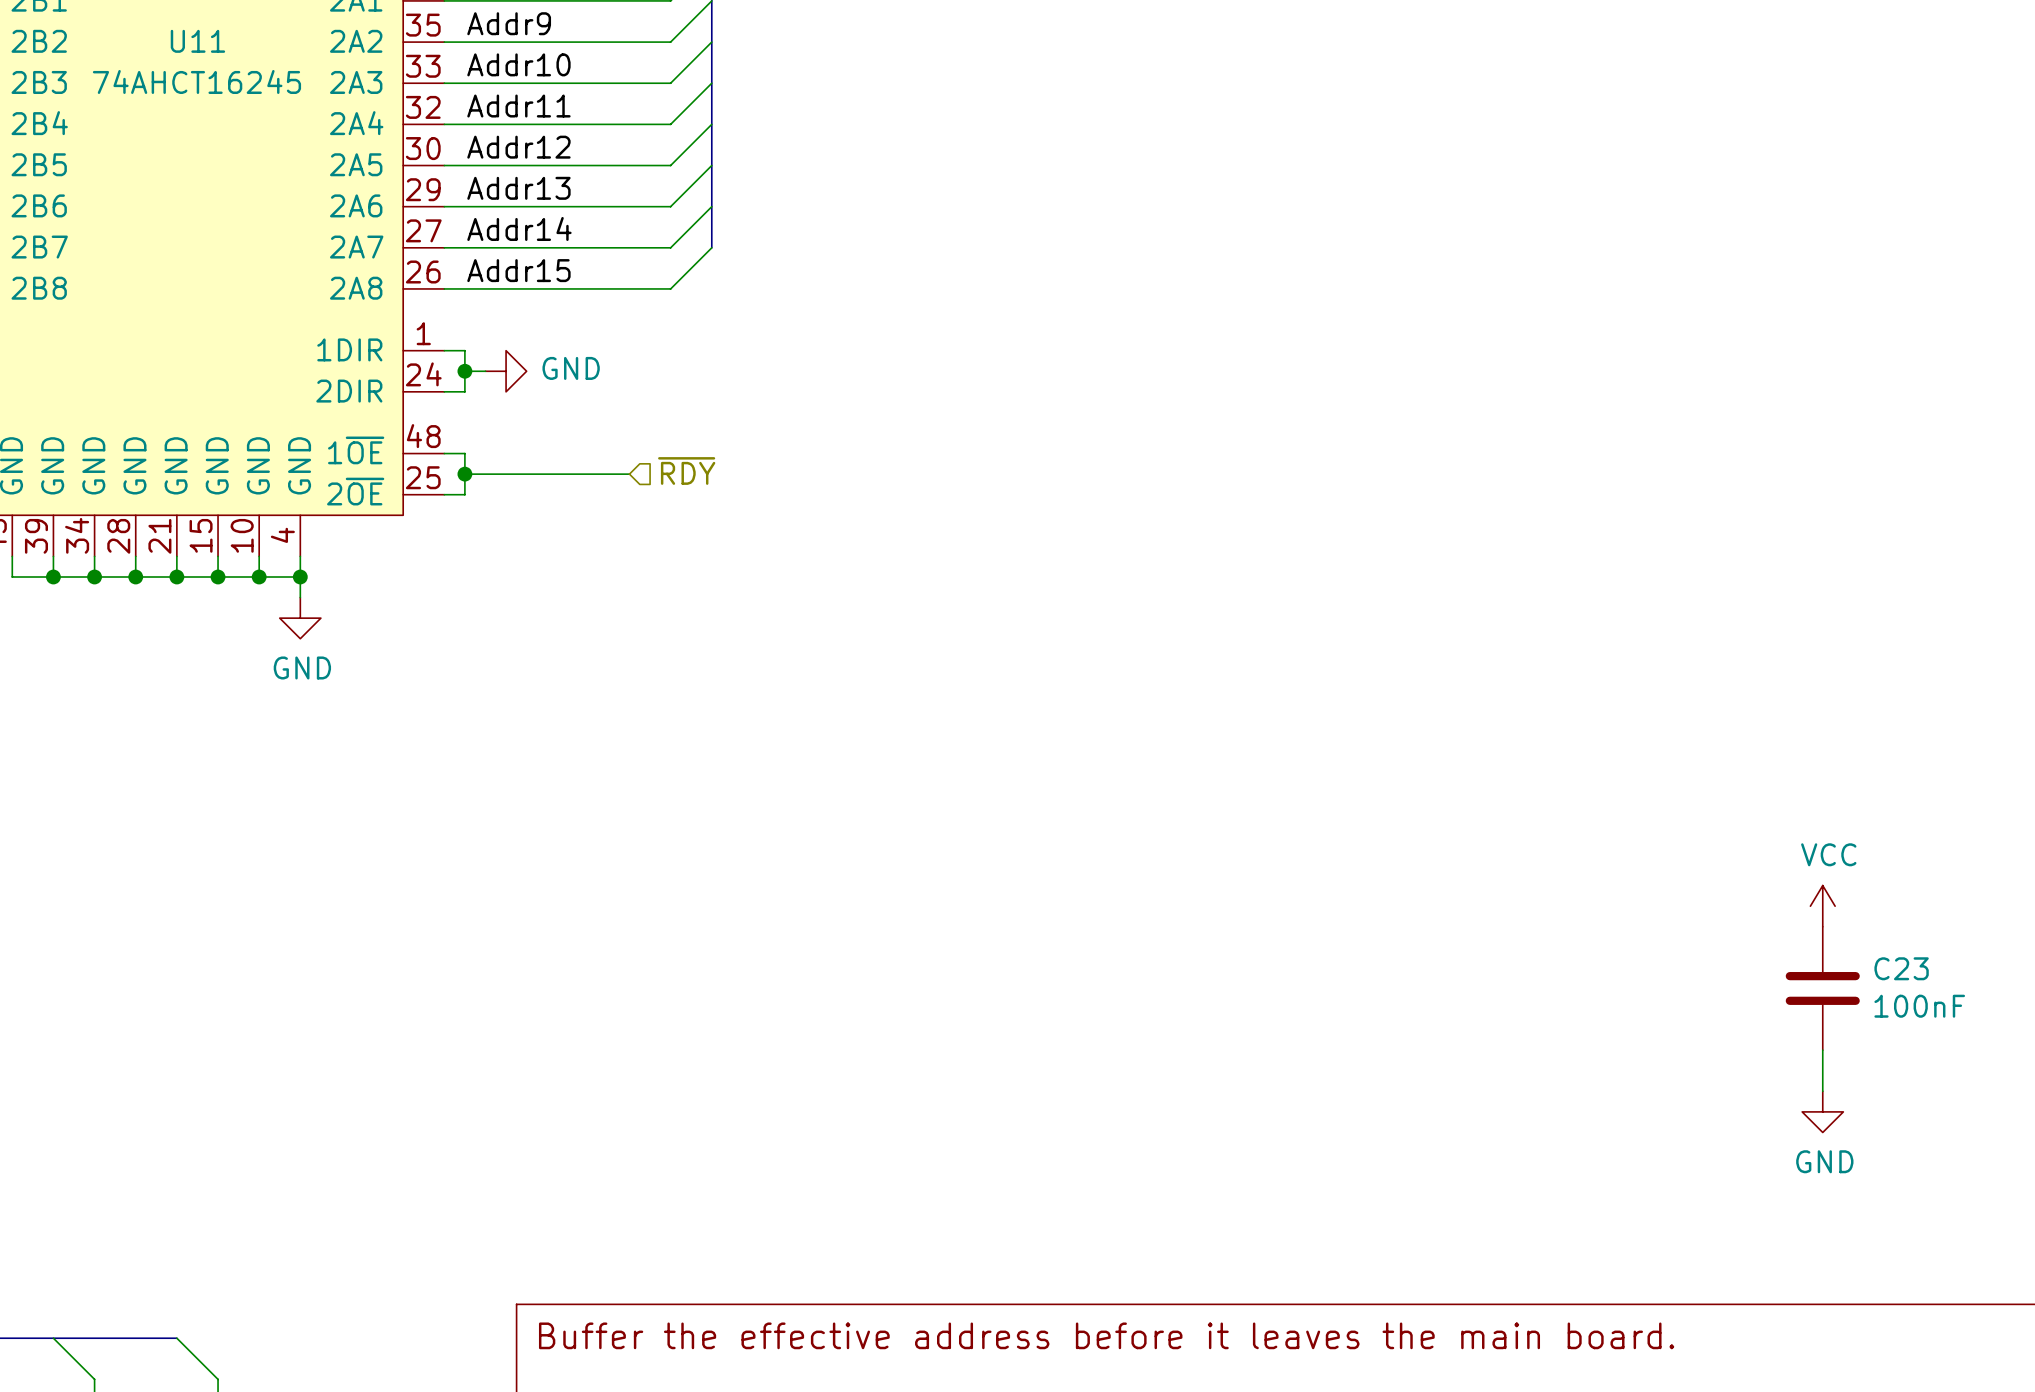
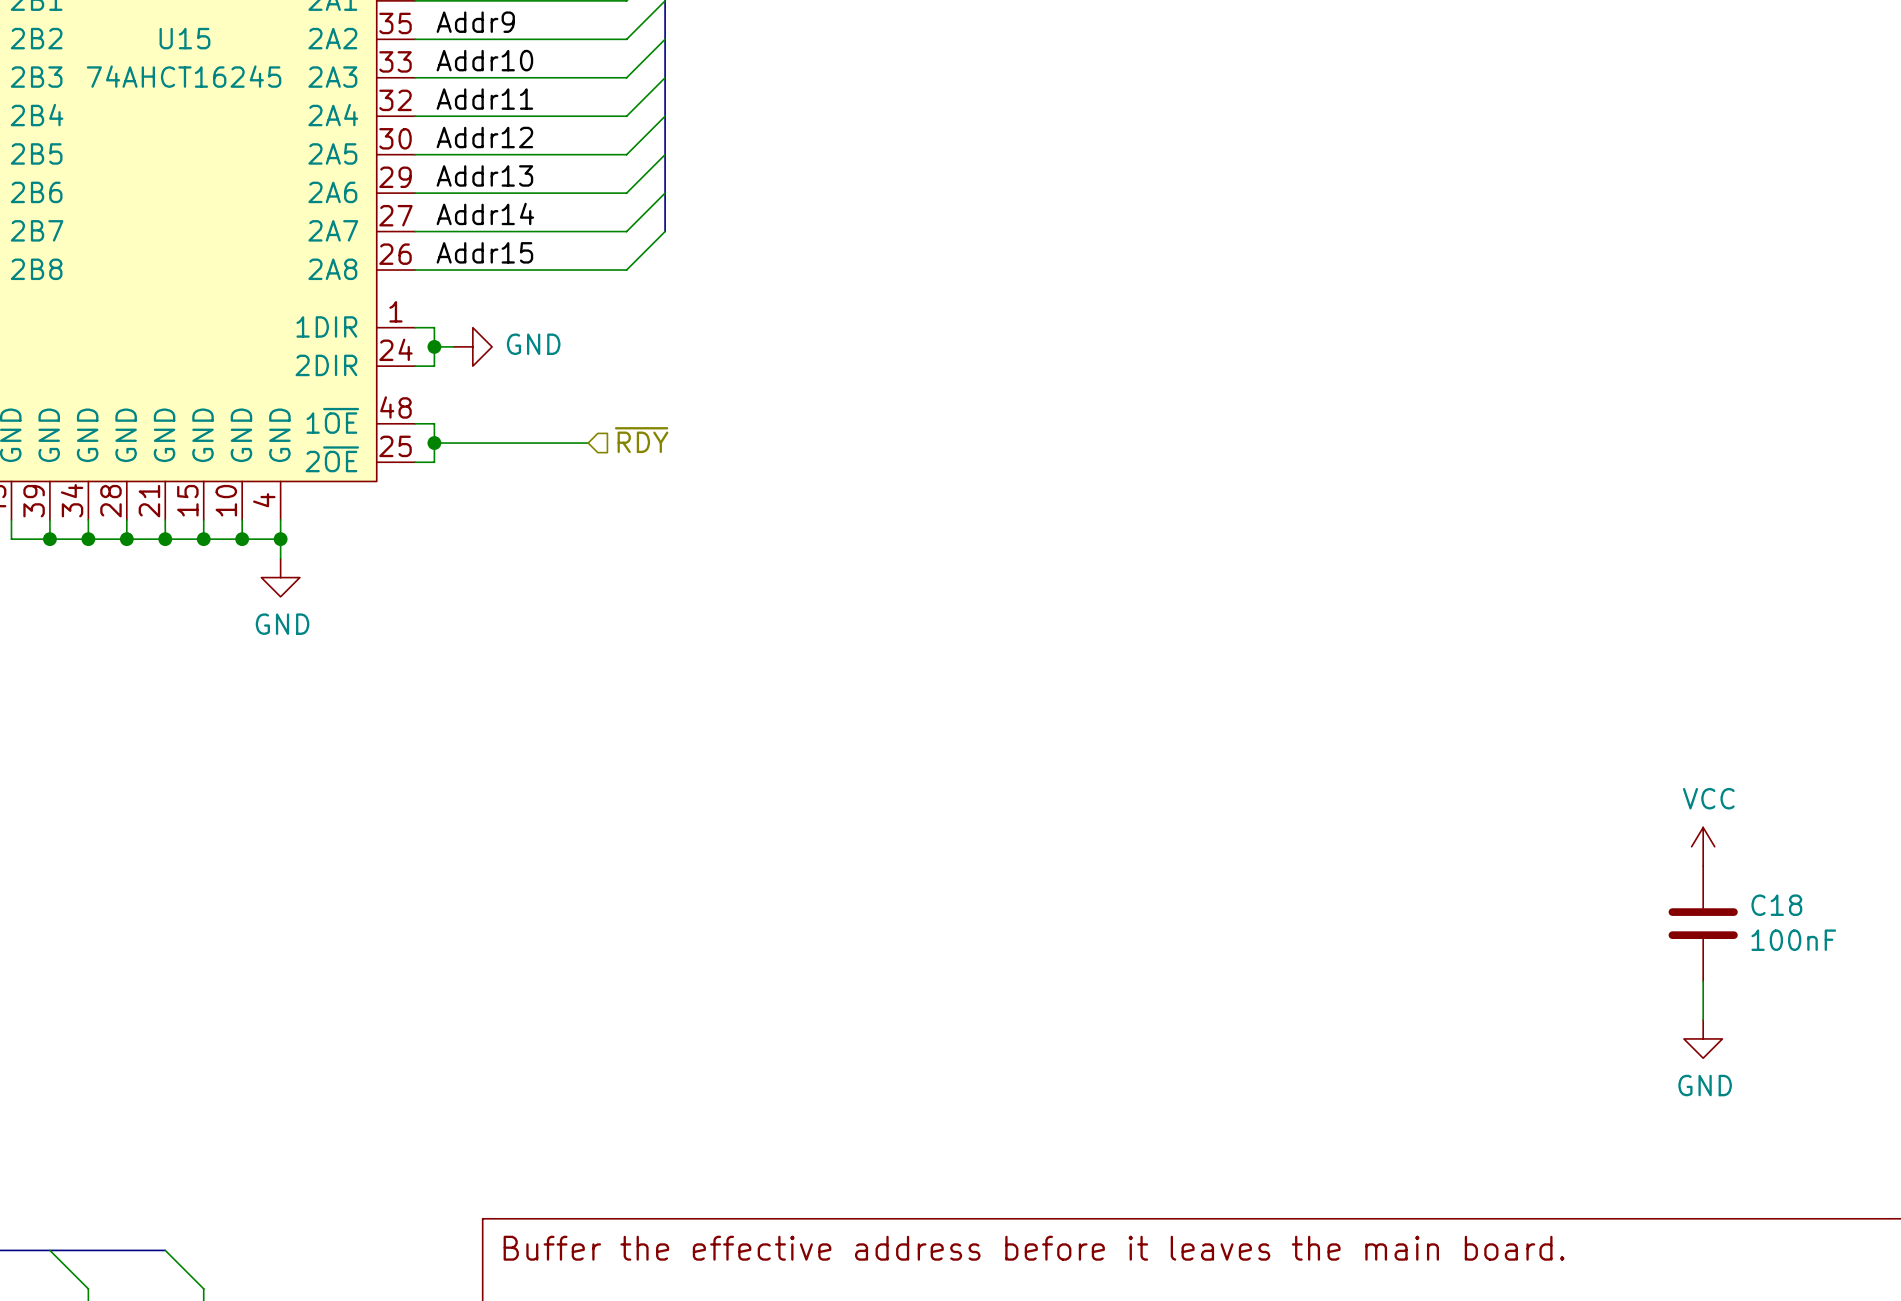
U11 name: U11 (197, 41) -> U15 (184, 38)
C23 name: C23 (1901, 968) -> C18 (1776, 905)

